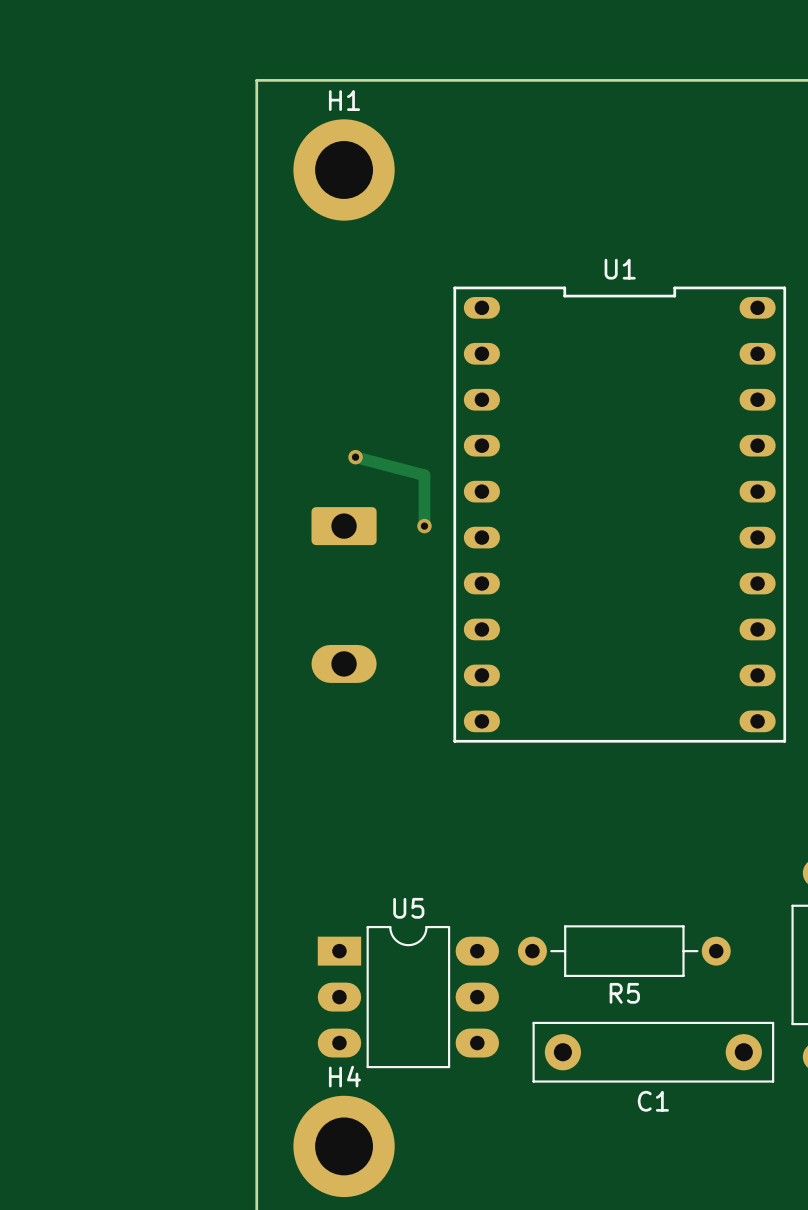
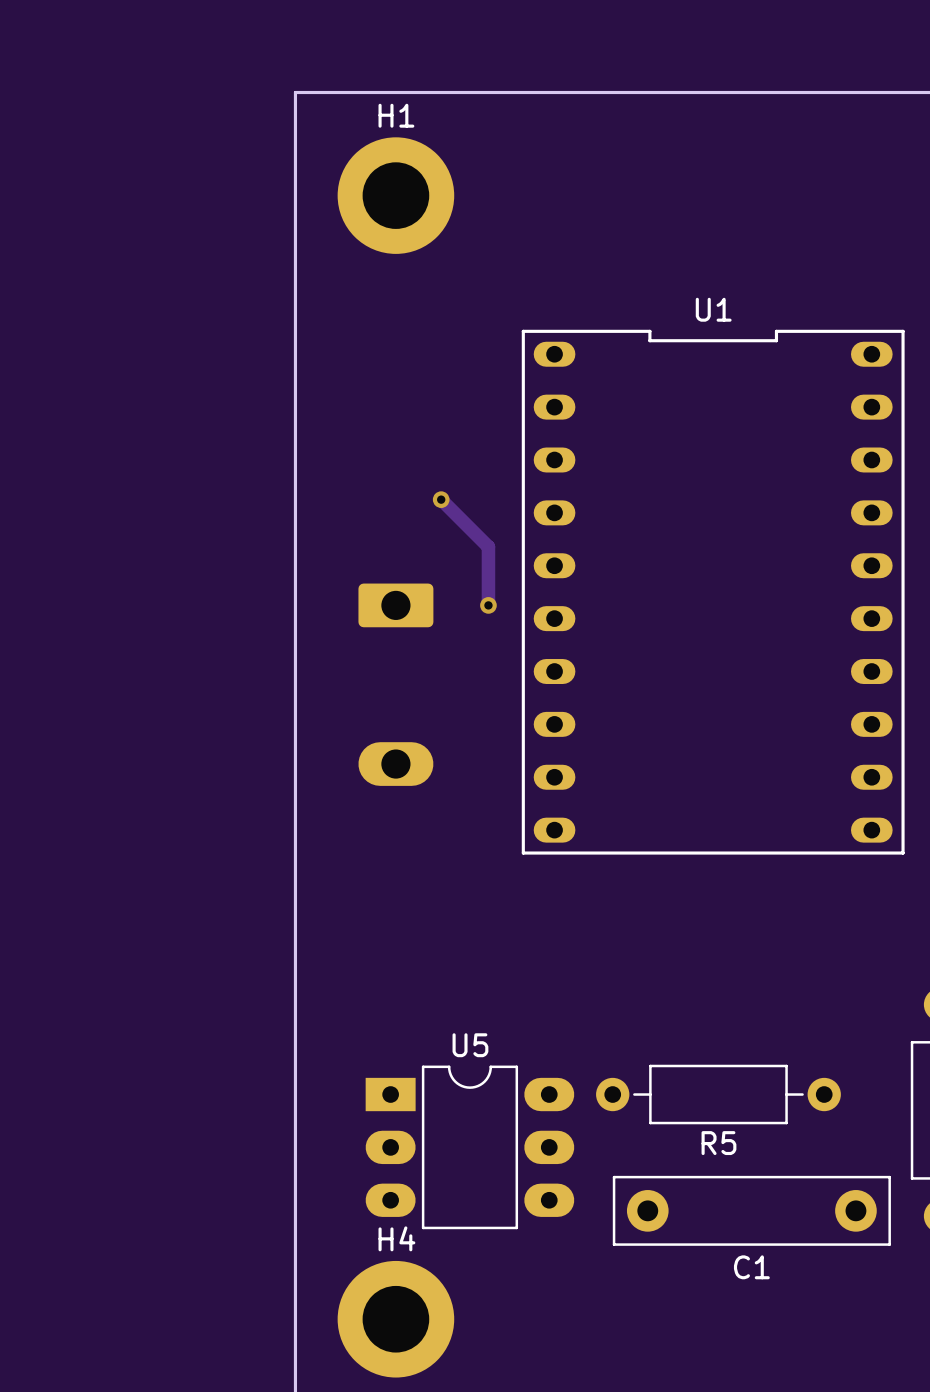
track: (355, 457) (424, 475) -> (441, 499) (488, 546)
via position: (355, 457) -> (441, 499)

